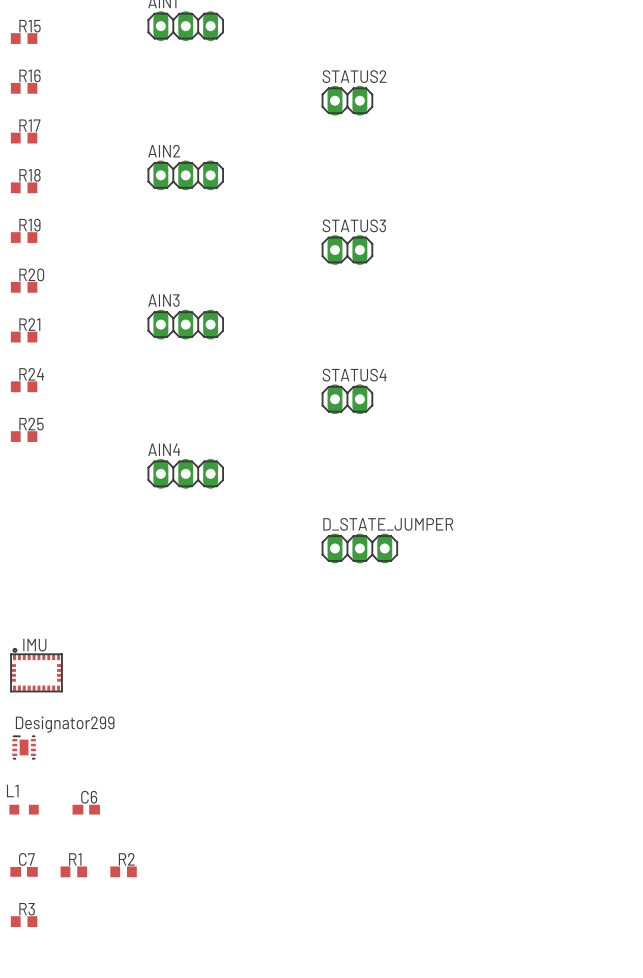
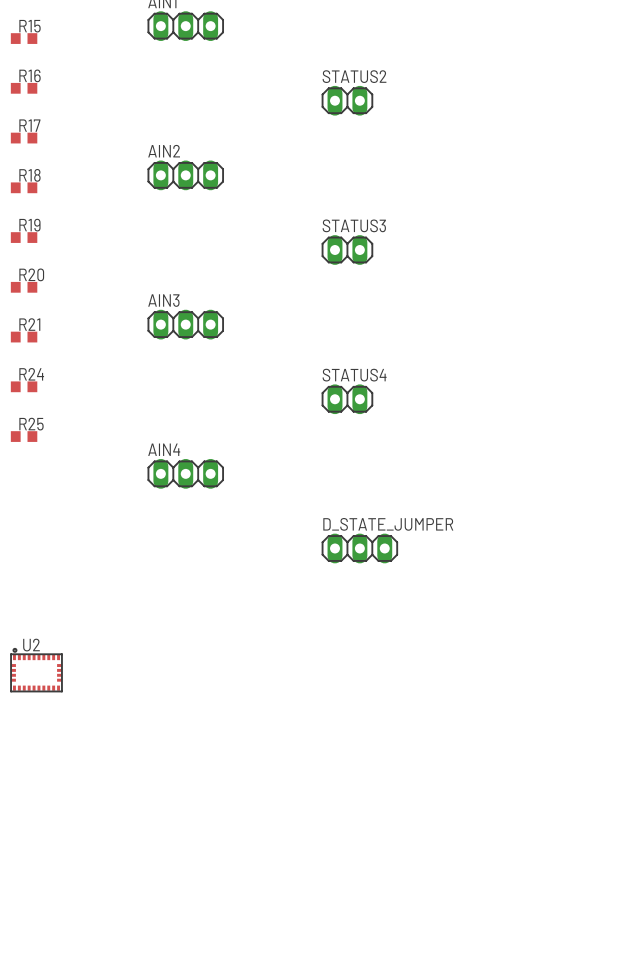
IMU name: IMU (34, 645) -> U2 (31, 645)
part: (24, 747) -> none
L1: (24, 809) -> none
C6: (86, 809) -> none
C7: (24, 871) -> none
R1: (73, 871) -> none
R2: (123, 871) -> none
R3: (24, 921) -> none

